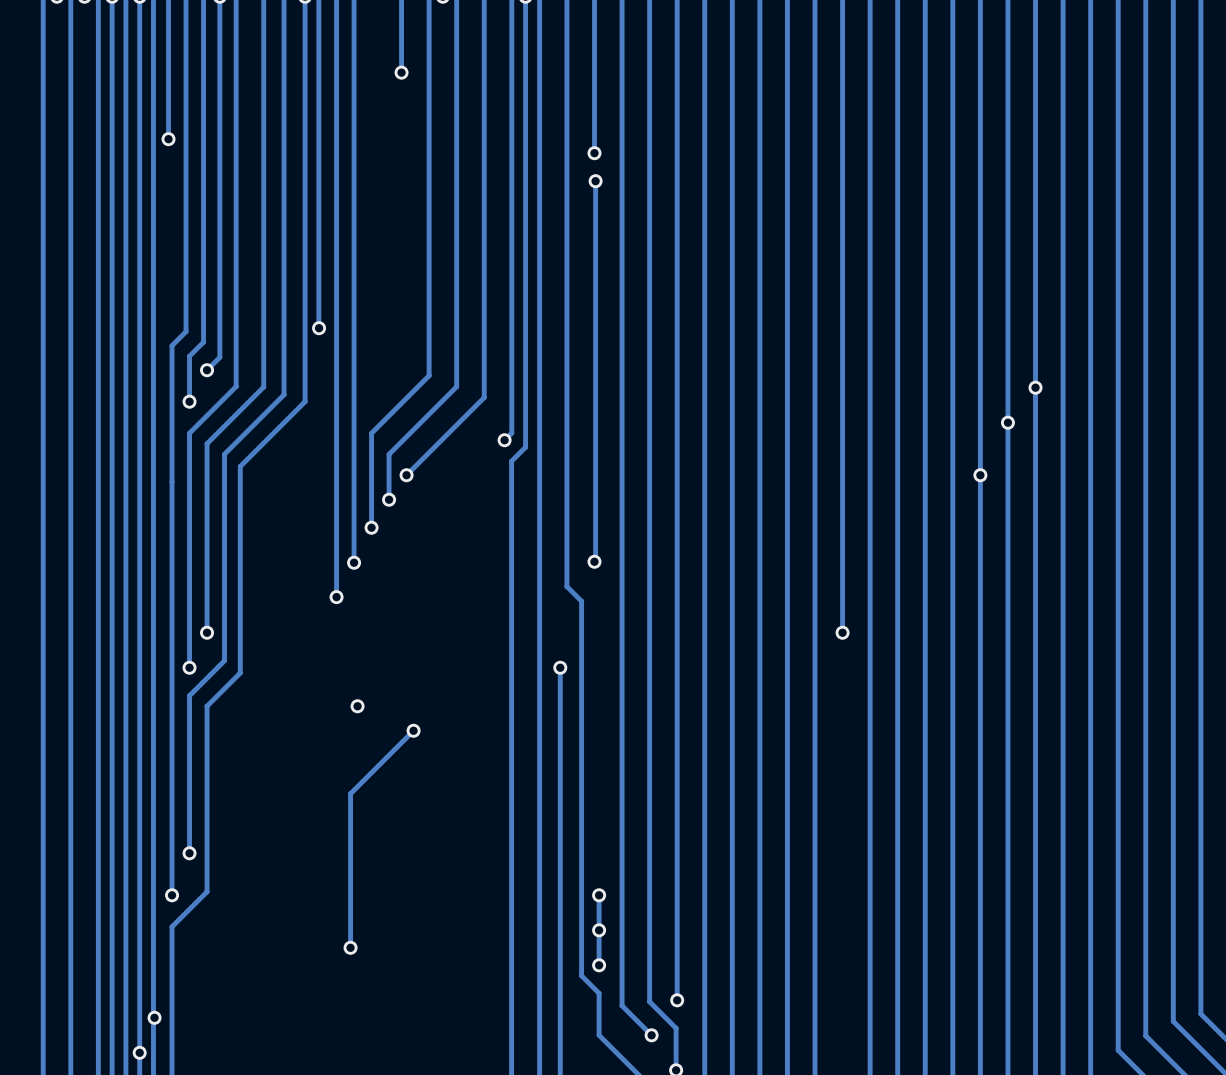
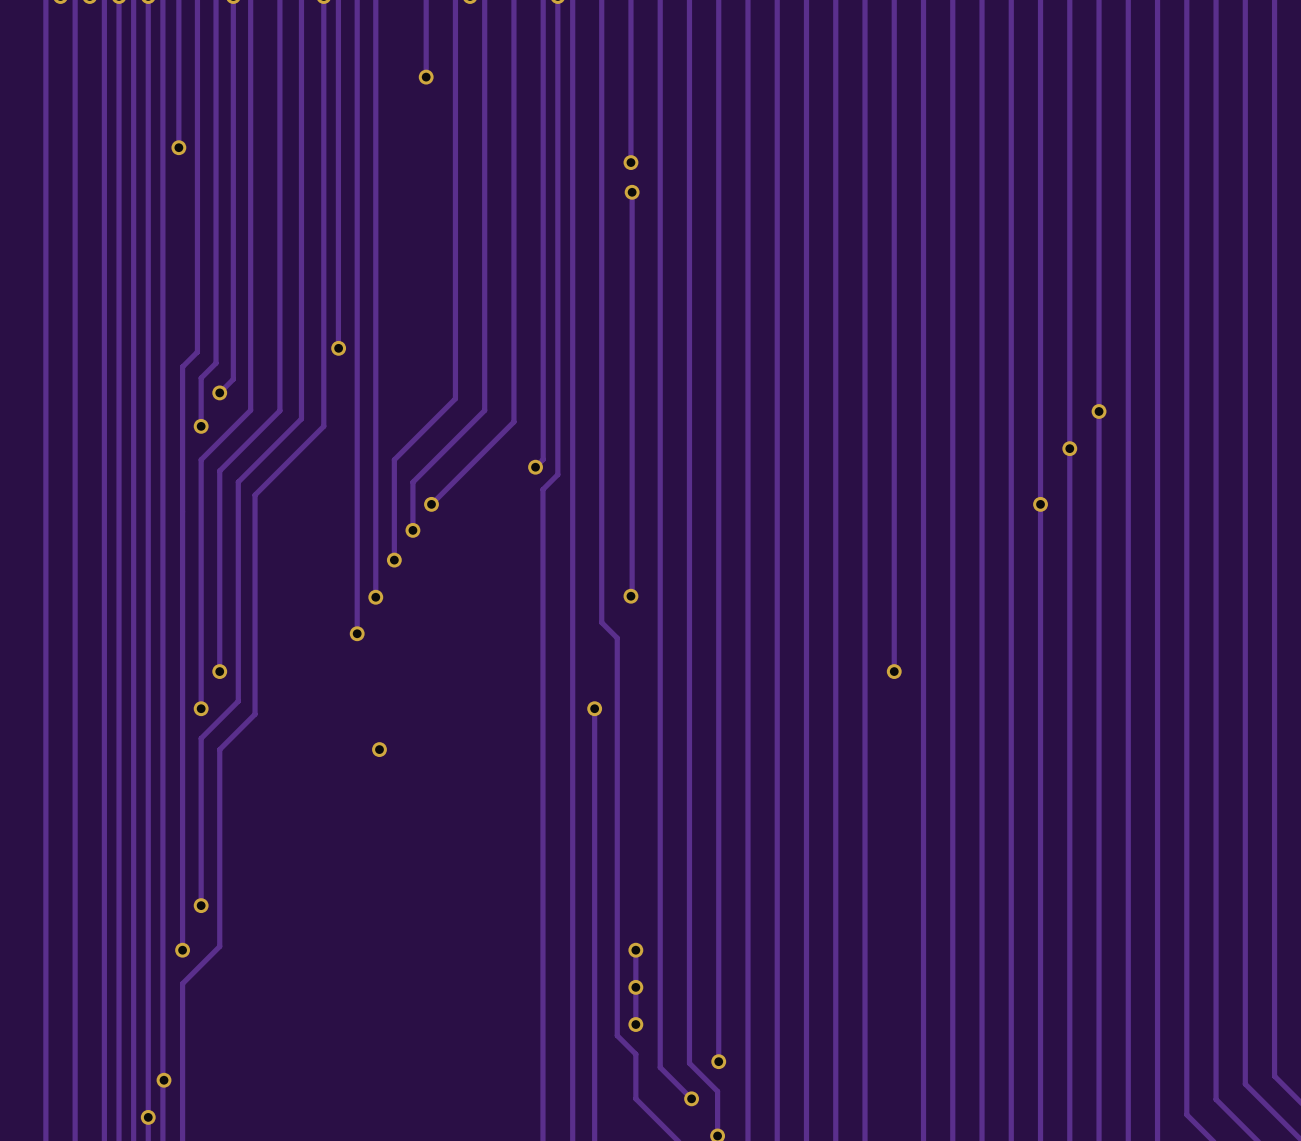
track: (413, 730) (350, 793) (350, 947) -> none
via: (413, 730) -> none
via: (350, 947) -> none

